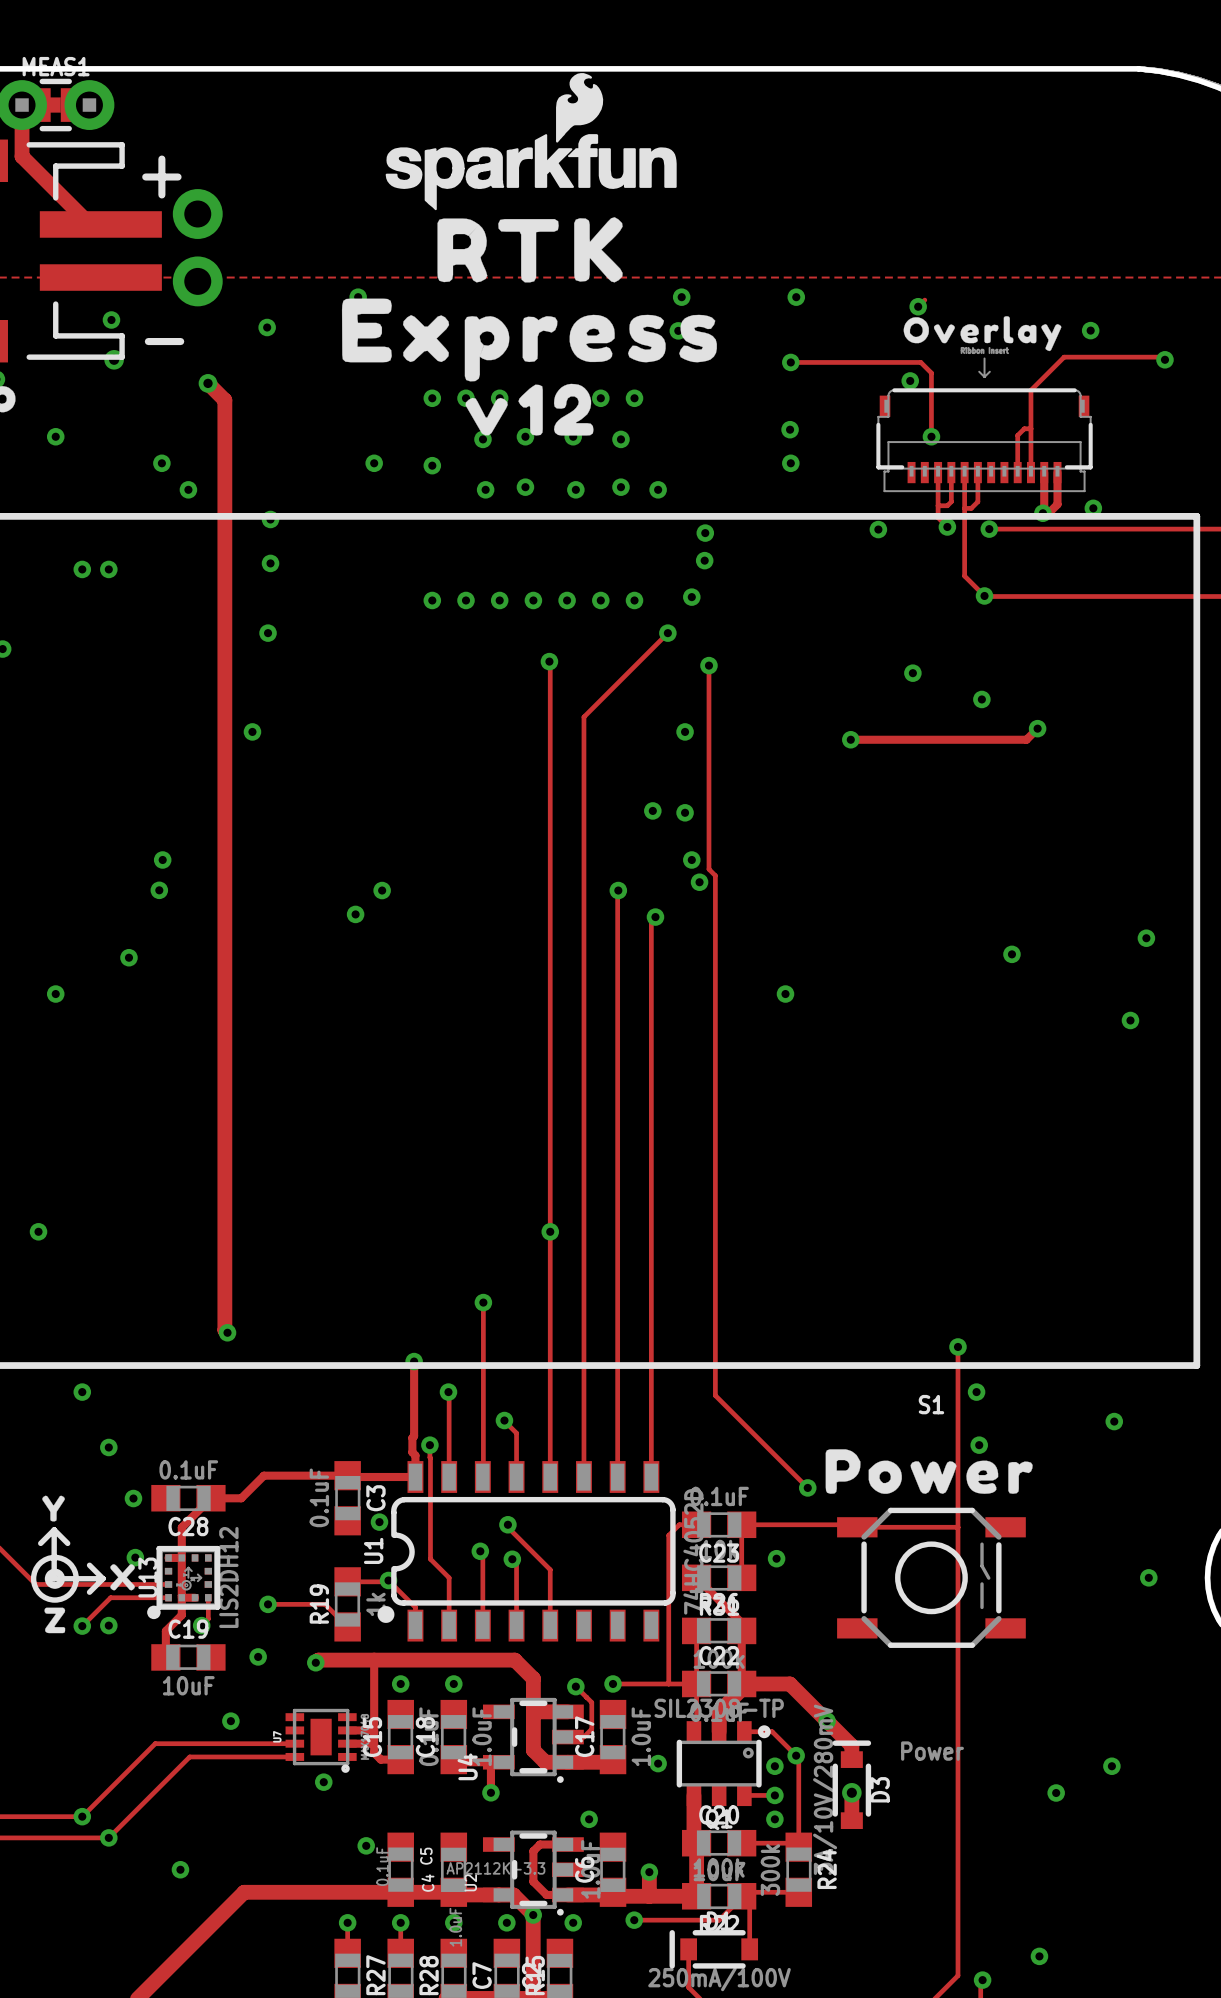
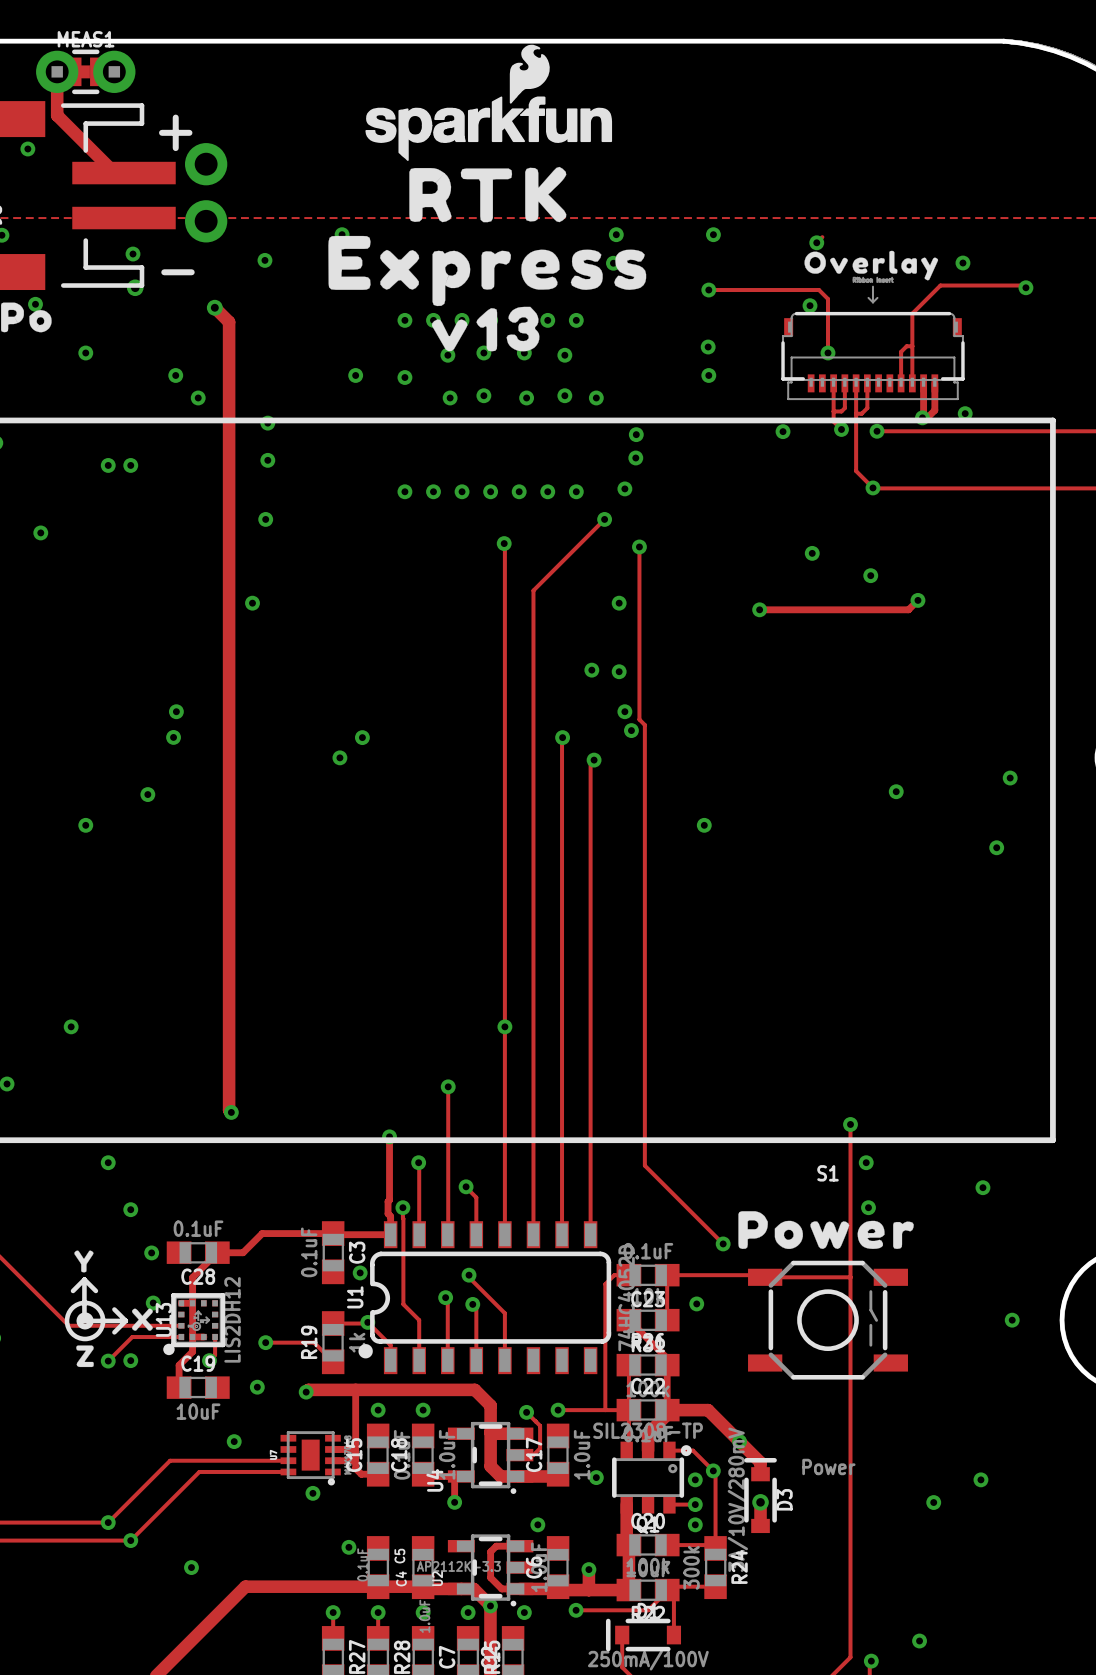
drawing shape: [465, 383, 594, 436] -> [431, 306, 540, 352]

